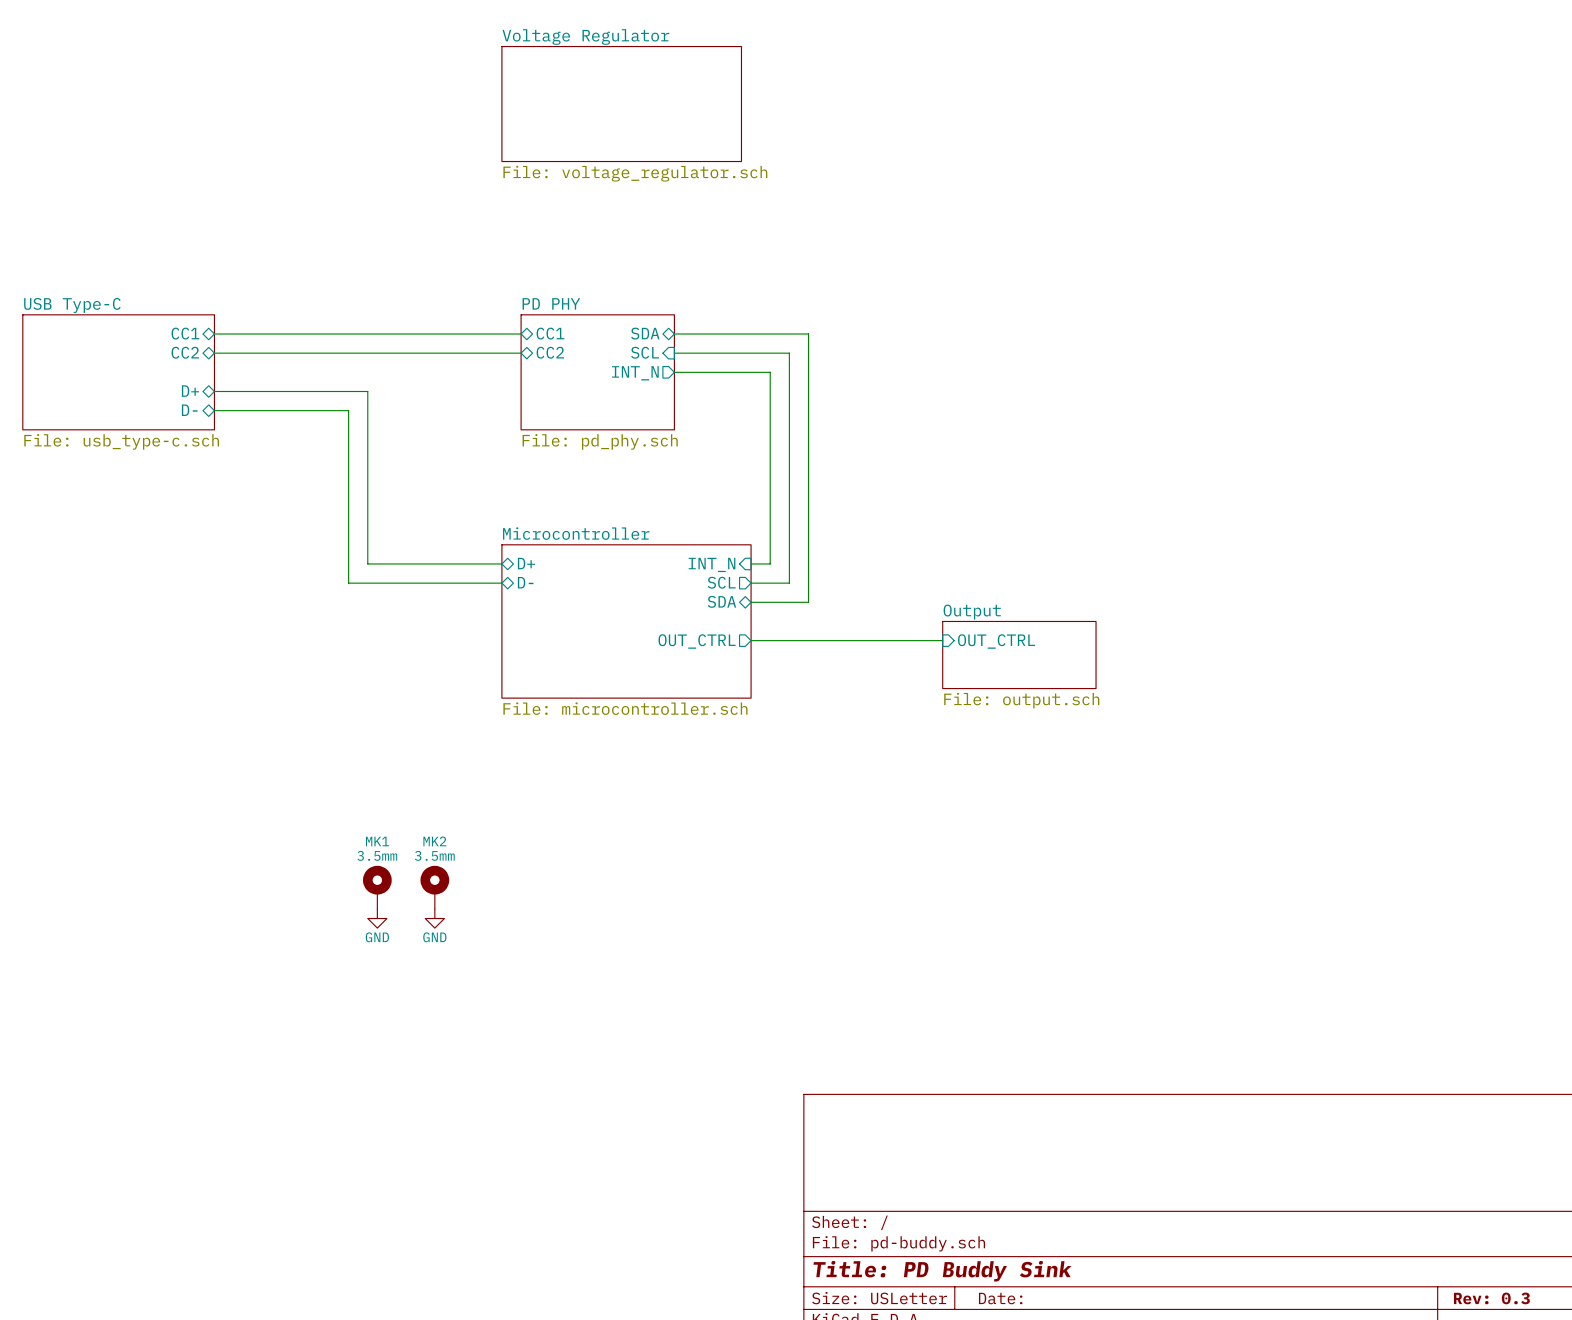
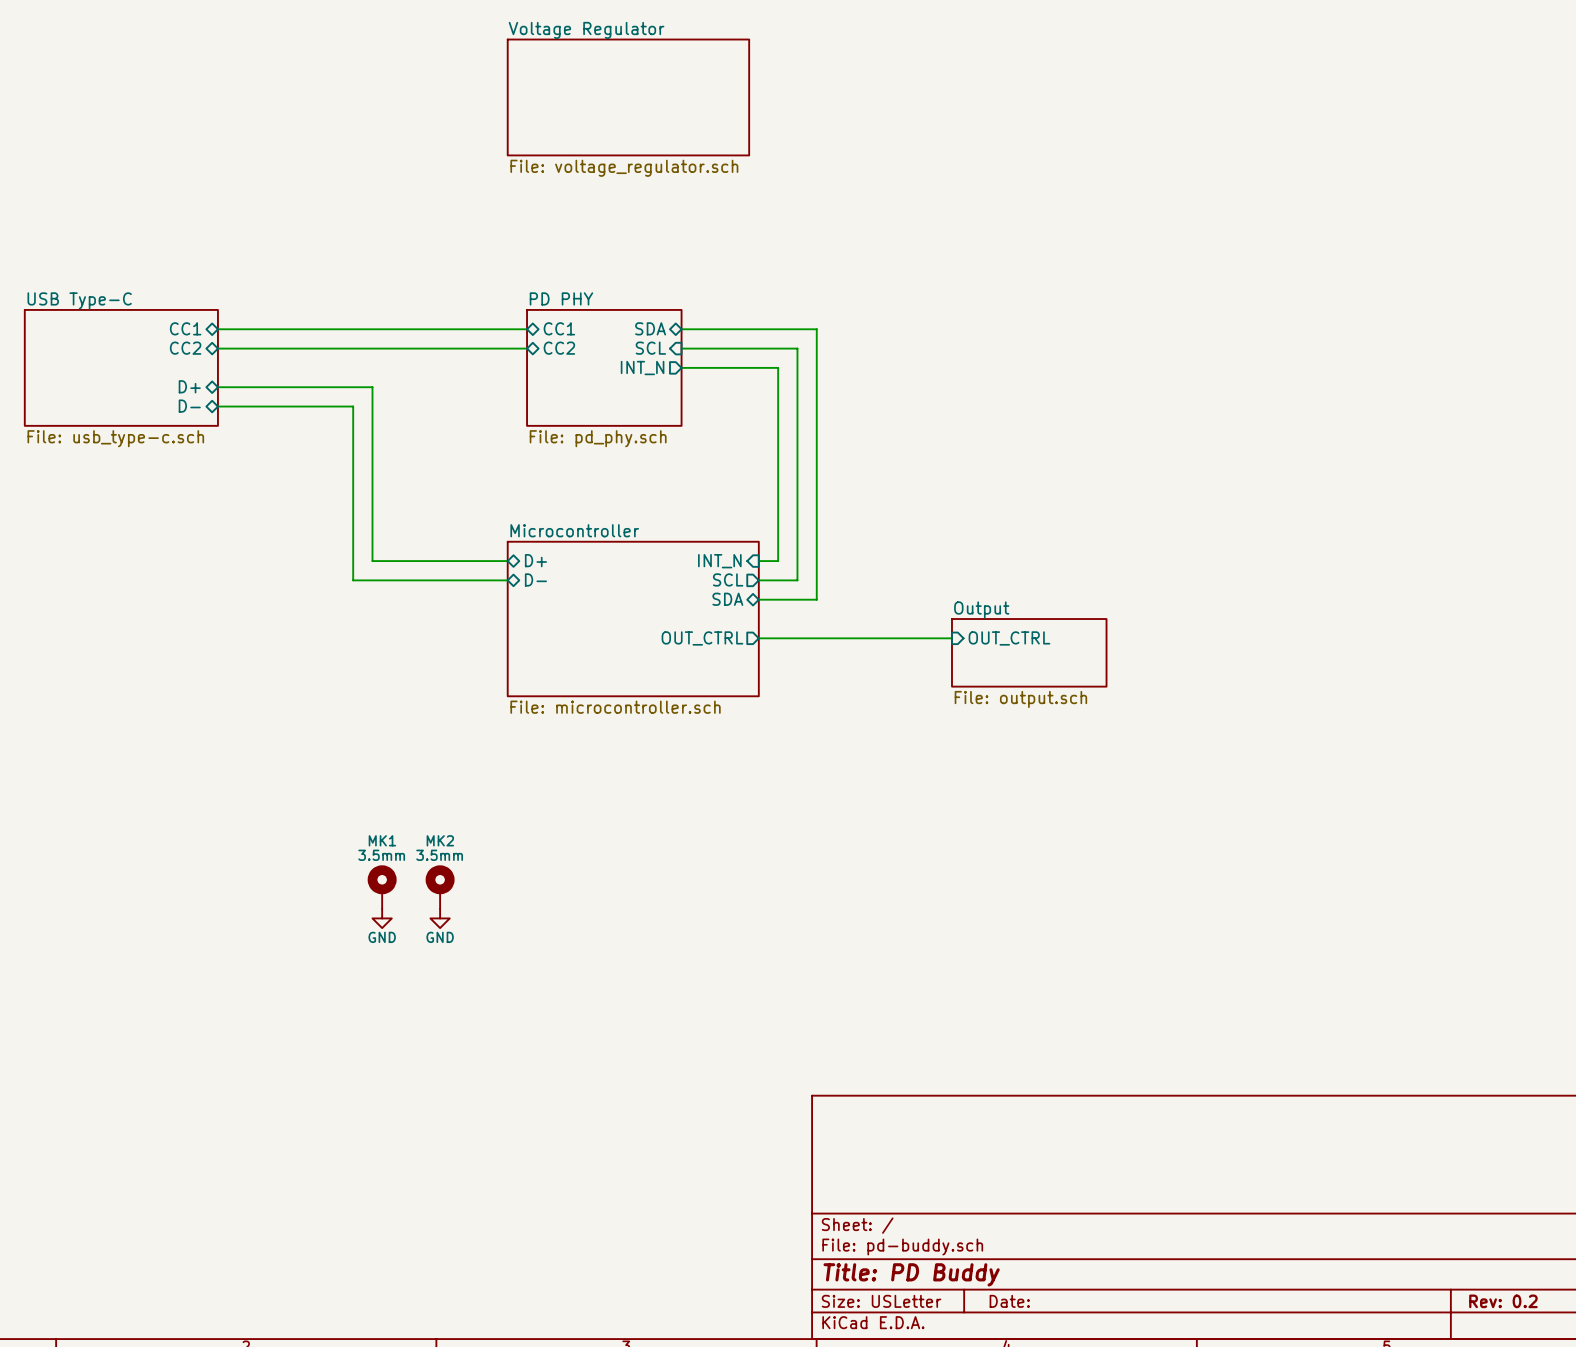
title block: Title: PD Buddy Sink (942, 1271) -> Title: PD Buddy (911, 1274)
title block: Rev: 0.3 (1491, 1298) -> Rev: 0.2 (1503, 1301)

